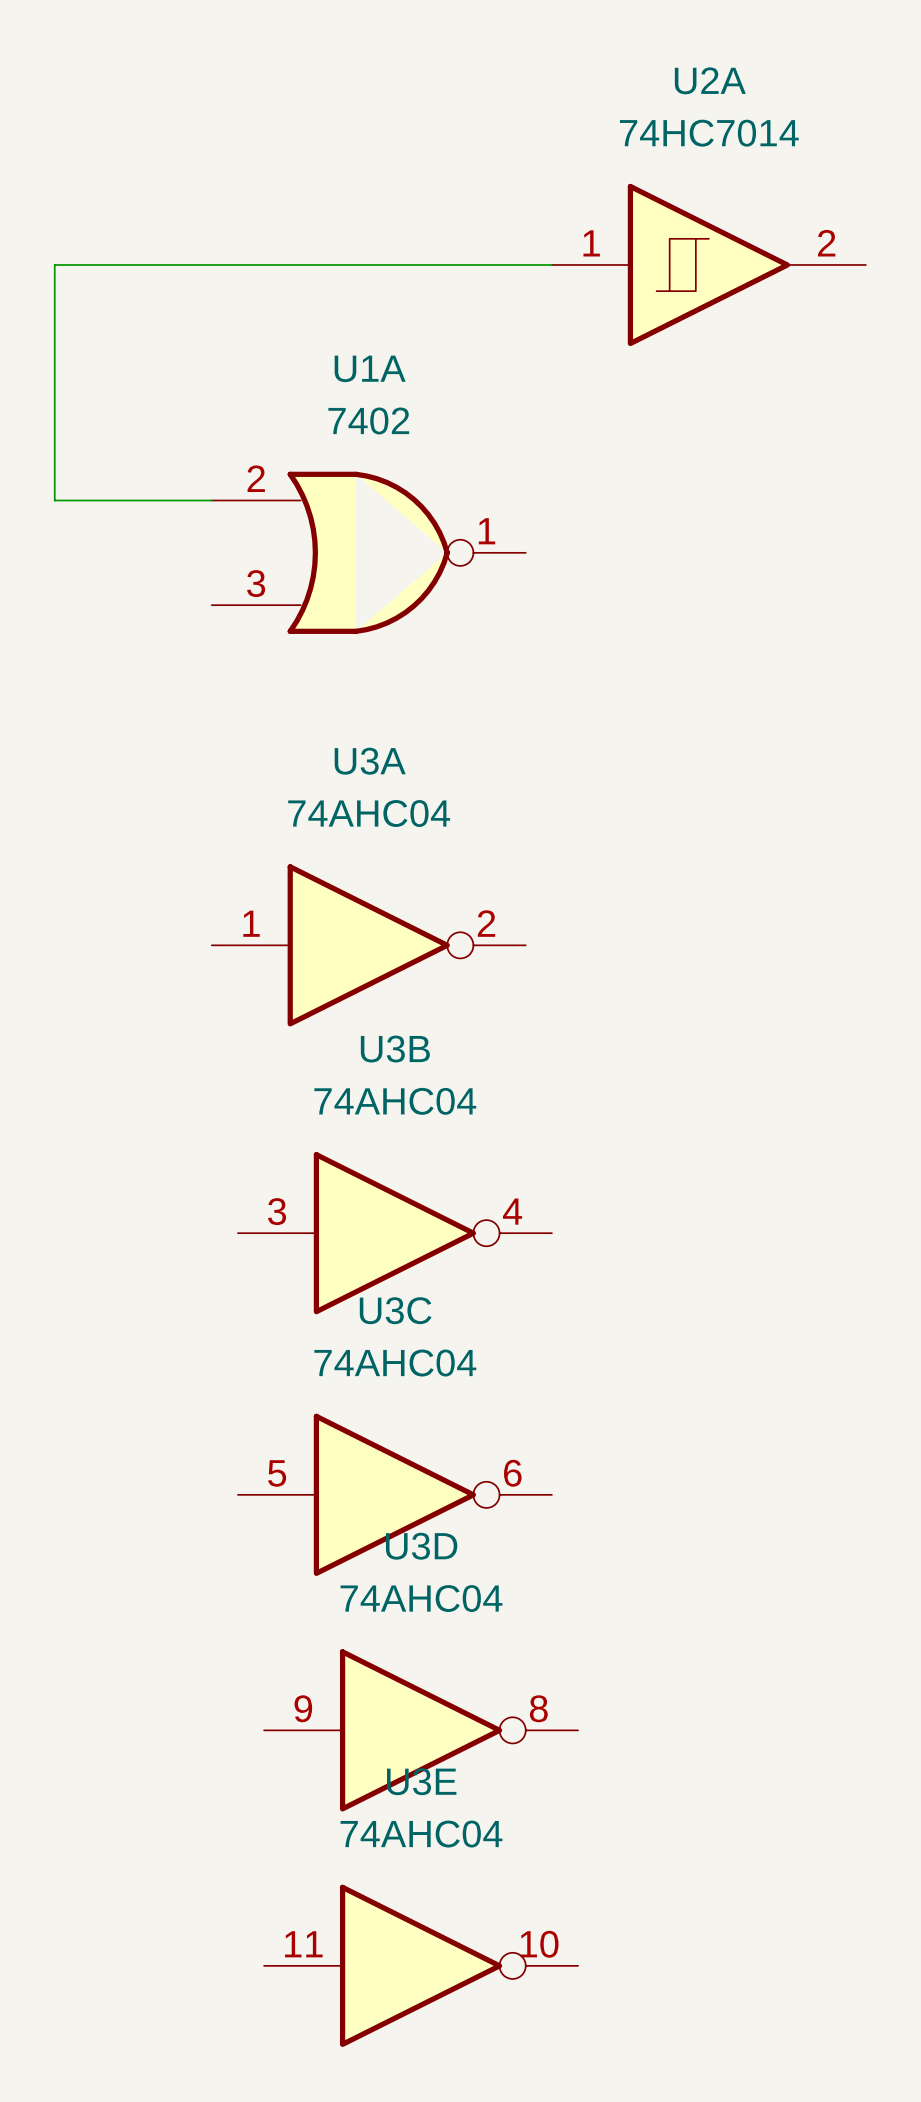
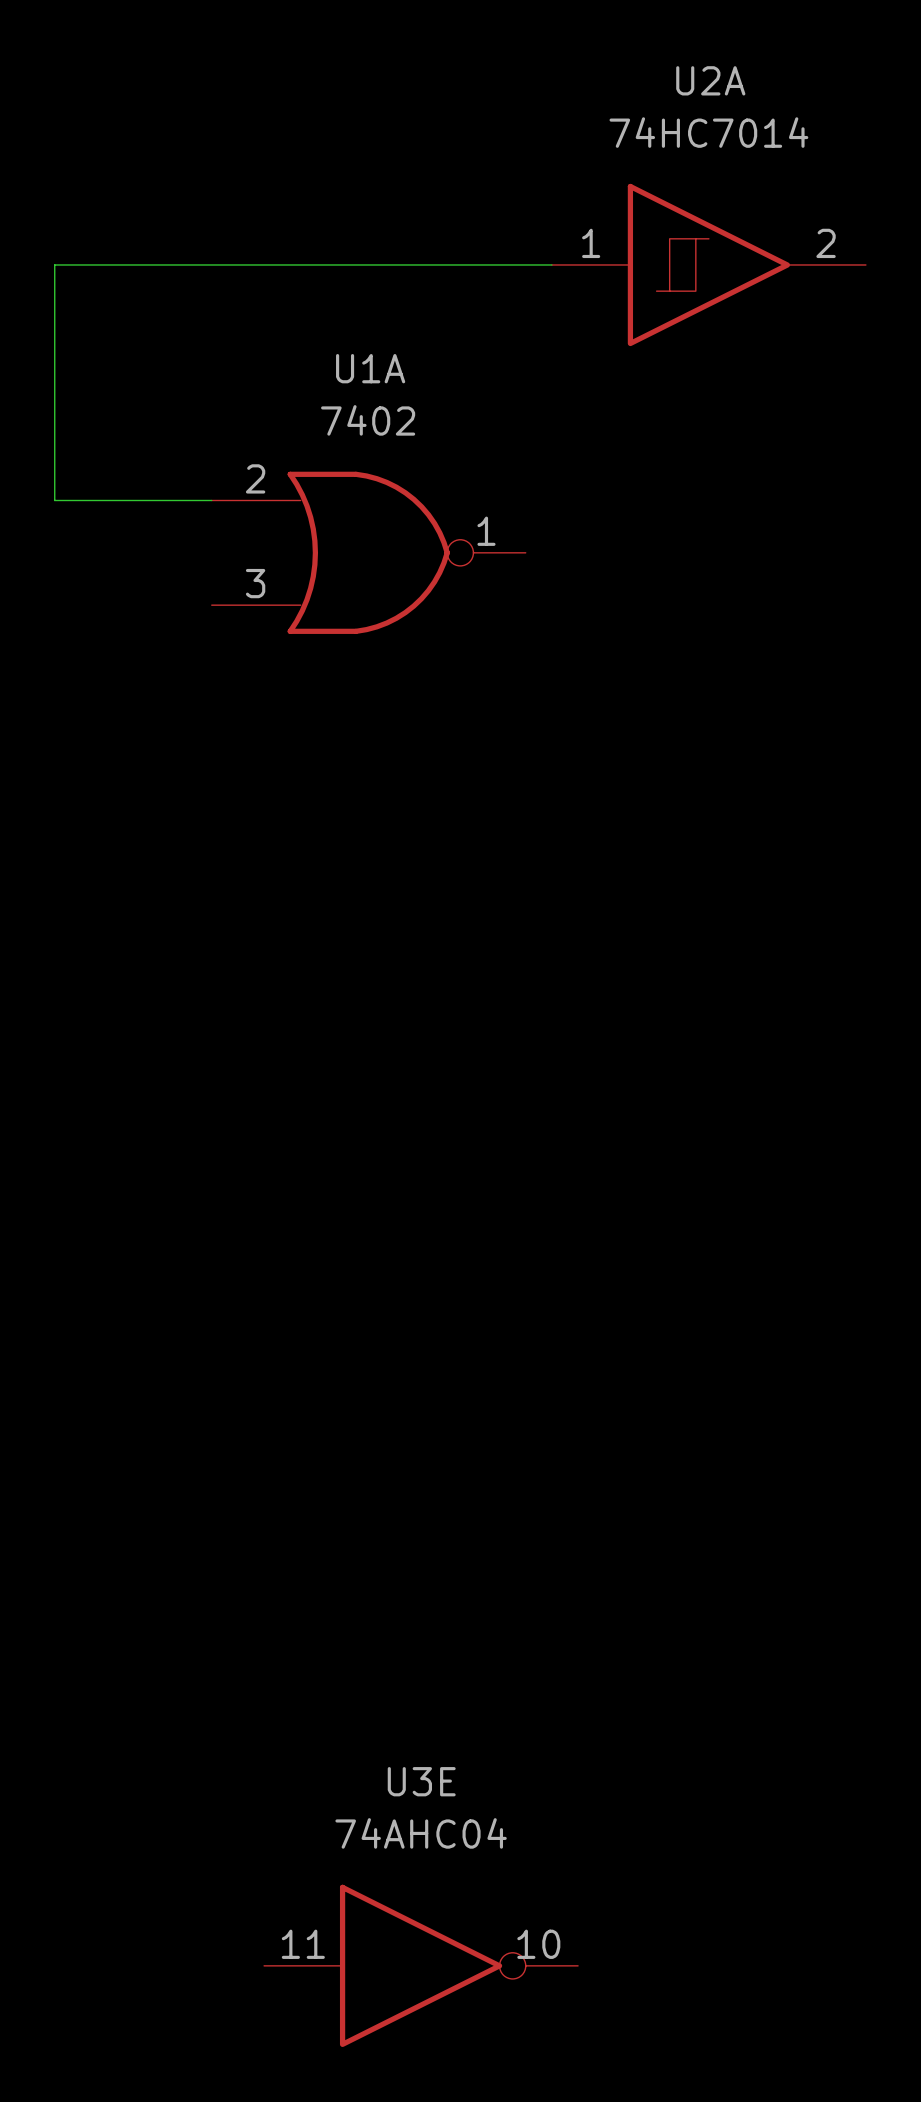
U3A: 74AHC04 (368, 945) -> none
U3B: 74AHC04 (394, 1233) -> none
U3C: 74AHC04 (394, 1494) -> none
U3D: 74AHC04 (421, 1730) -> none

